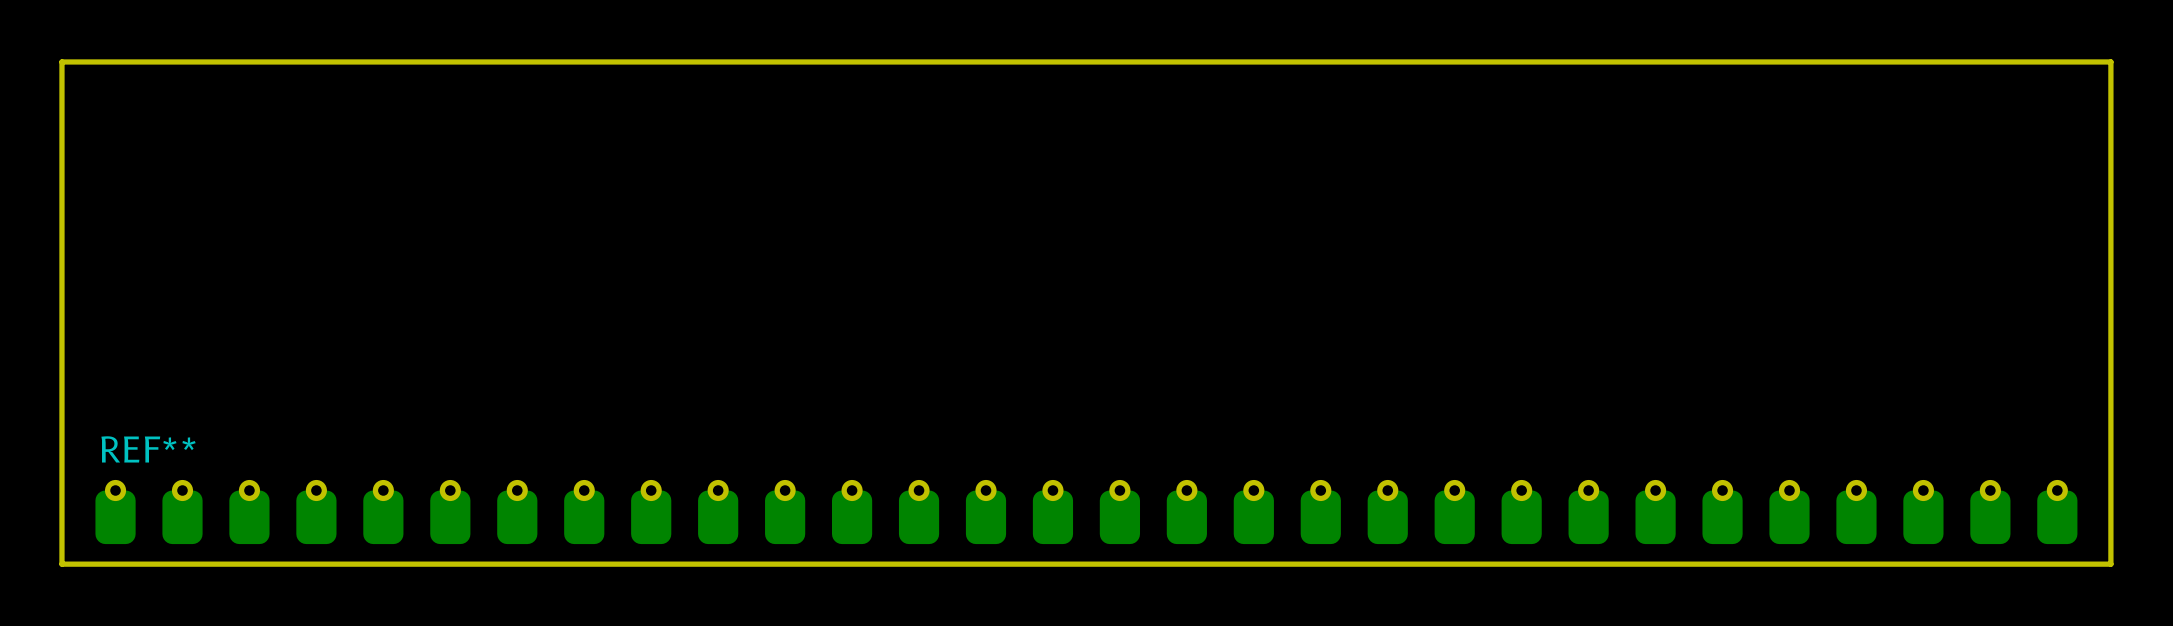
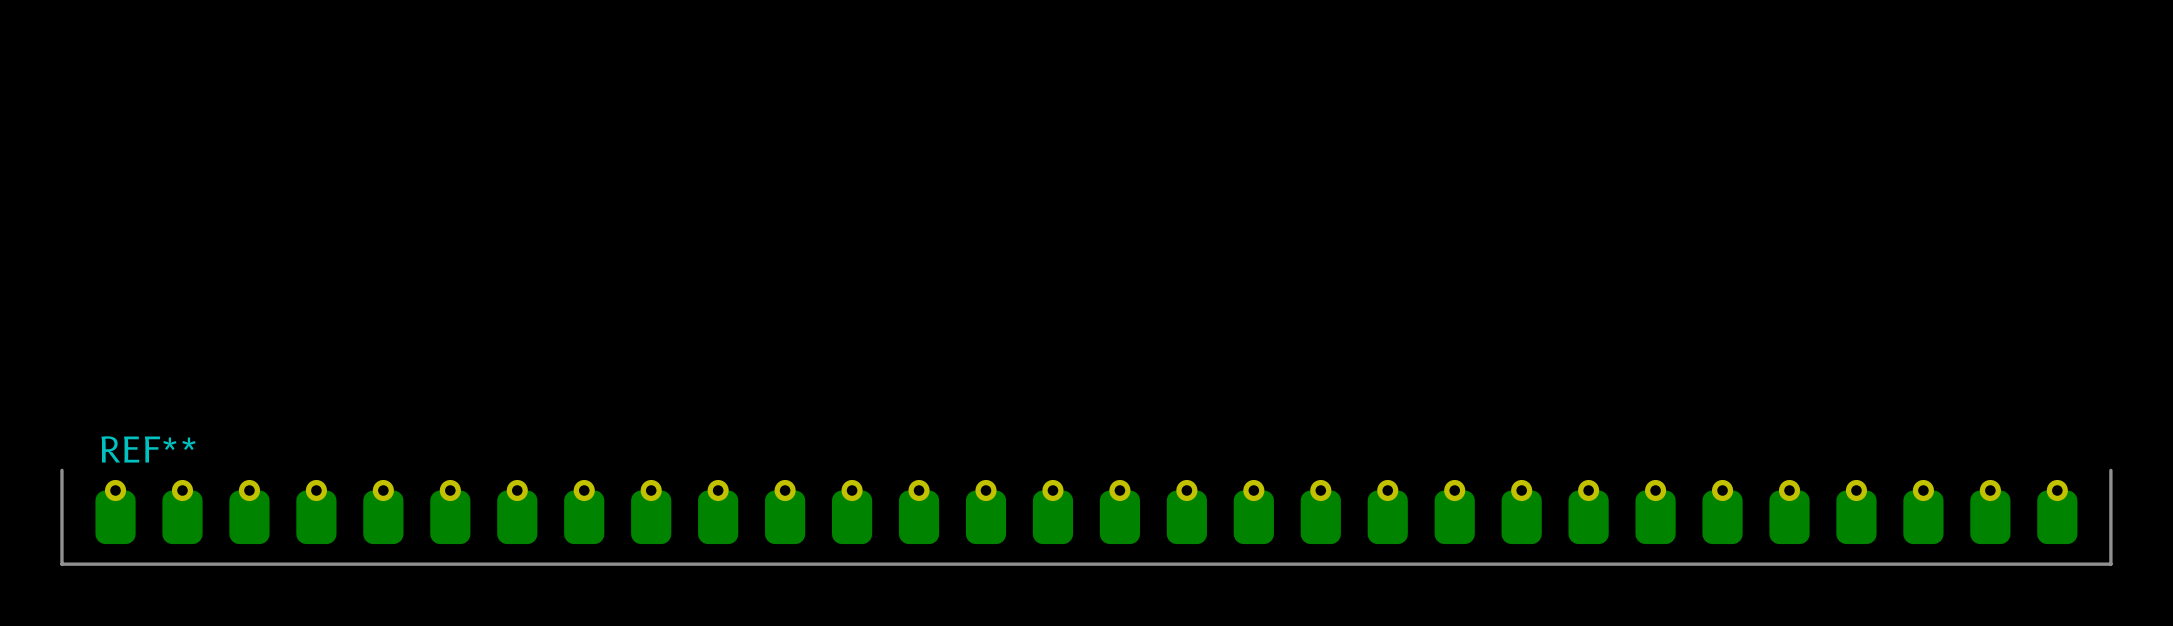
board edge: (2110, 61) (2110, 564) (61, 564) (61, 61) (2110, 61) -> none

